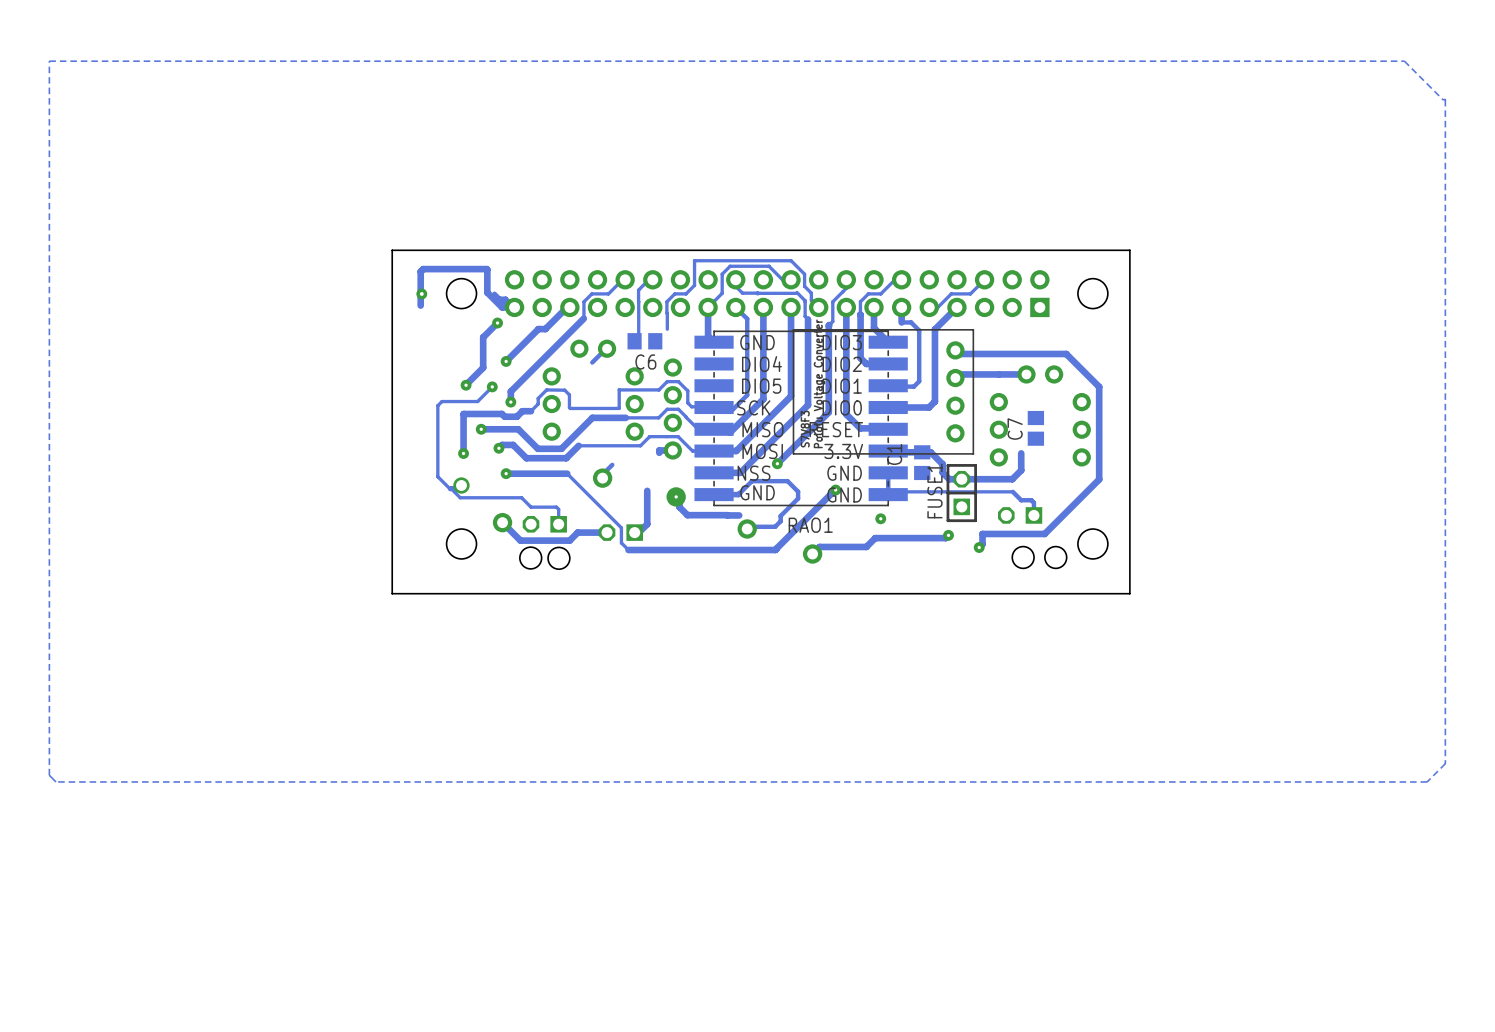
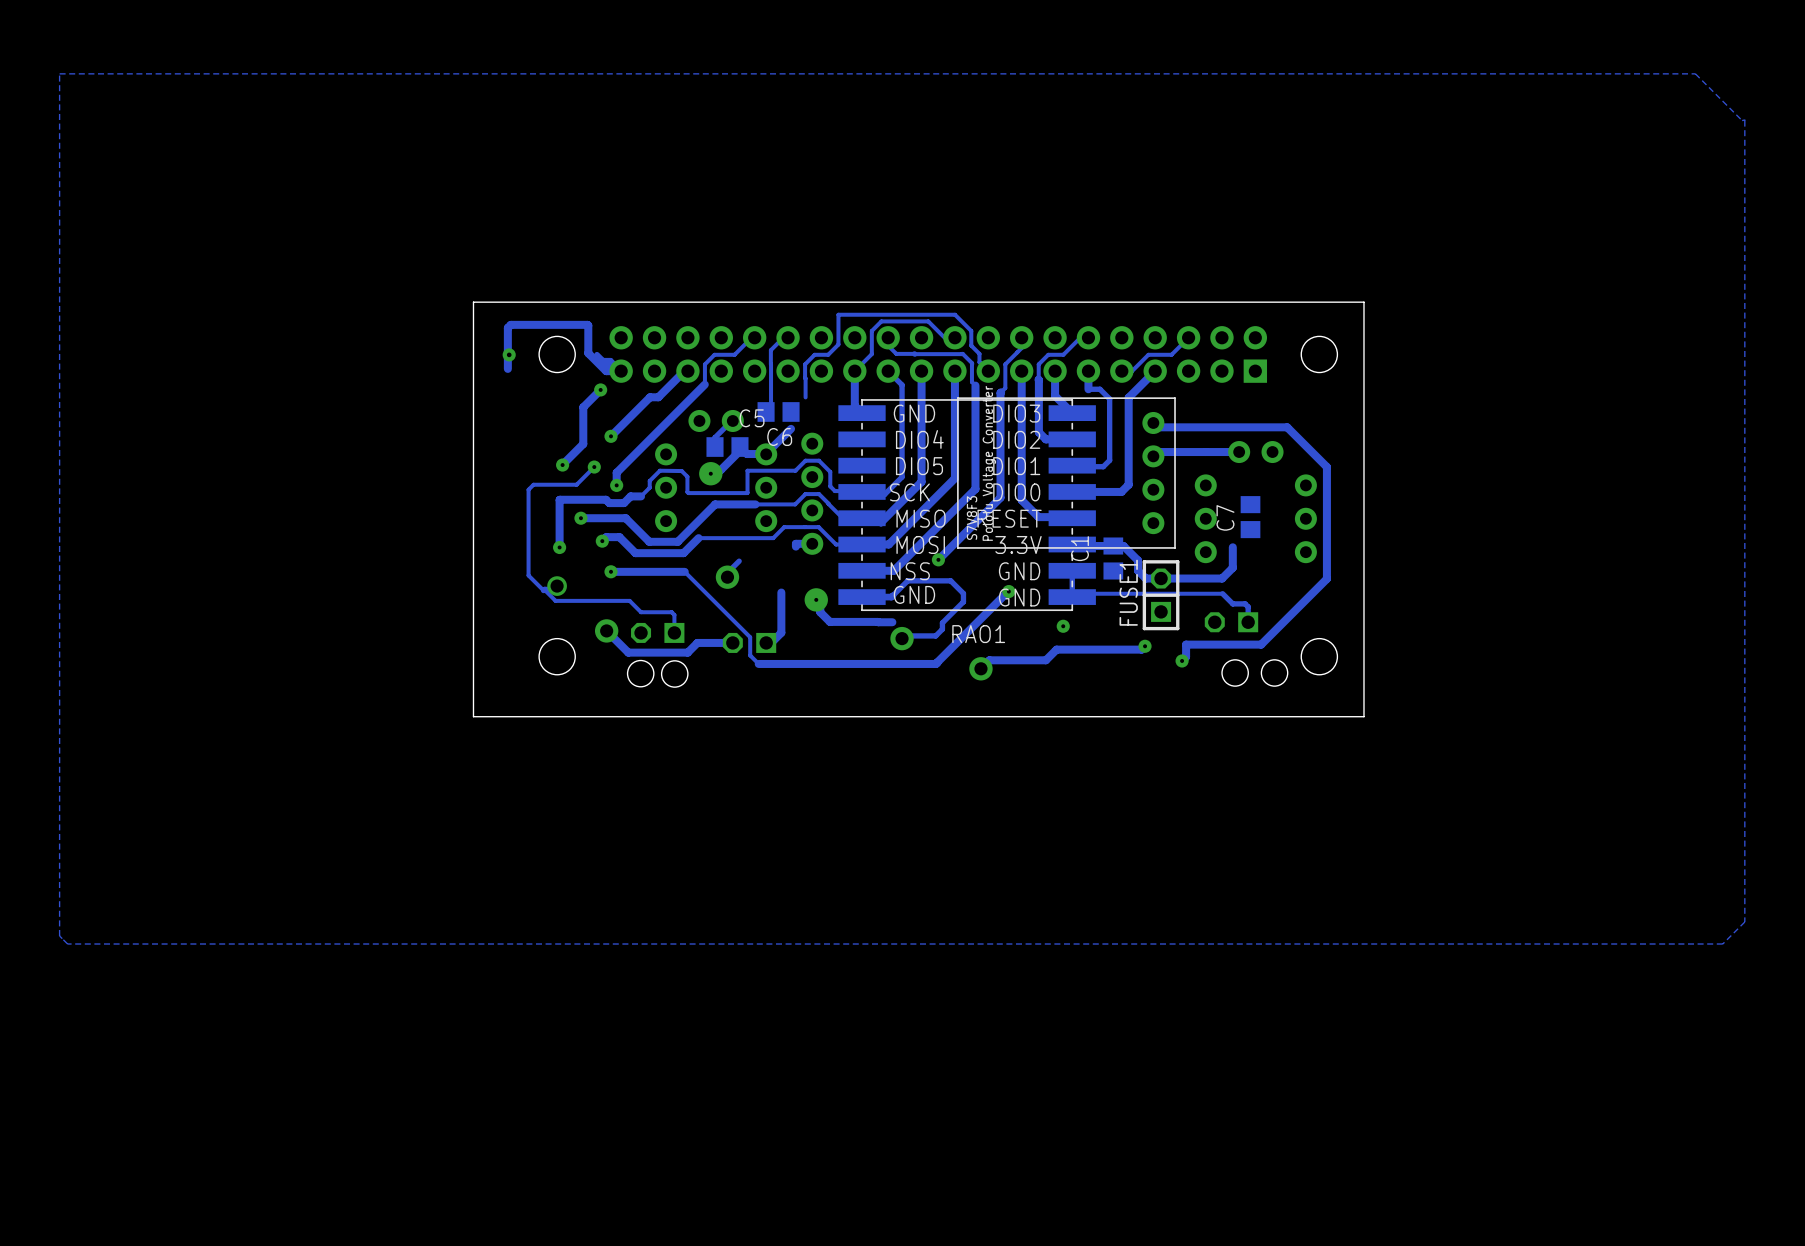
track: none -> (791, 428) (765, 454) (746, 454) (739, 447) (739, 450) (720, 470) (714, 470) (710, 473)
C5: none -> (727, 447)
via: none -> (710, 473)

